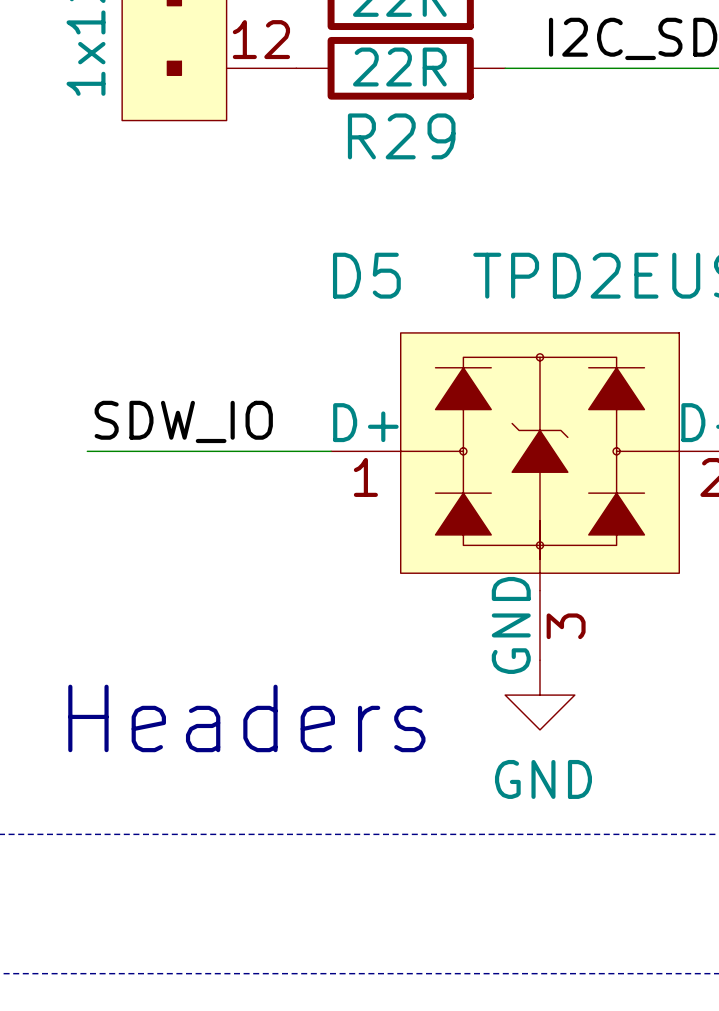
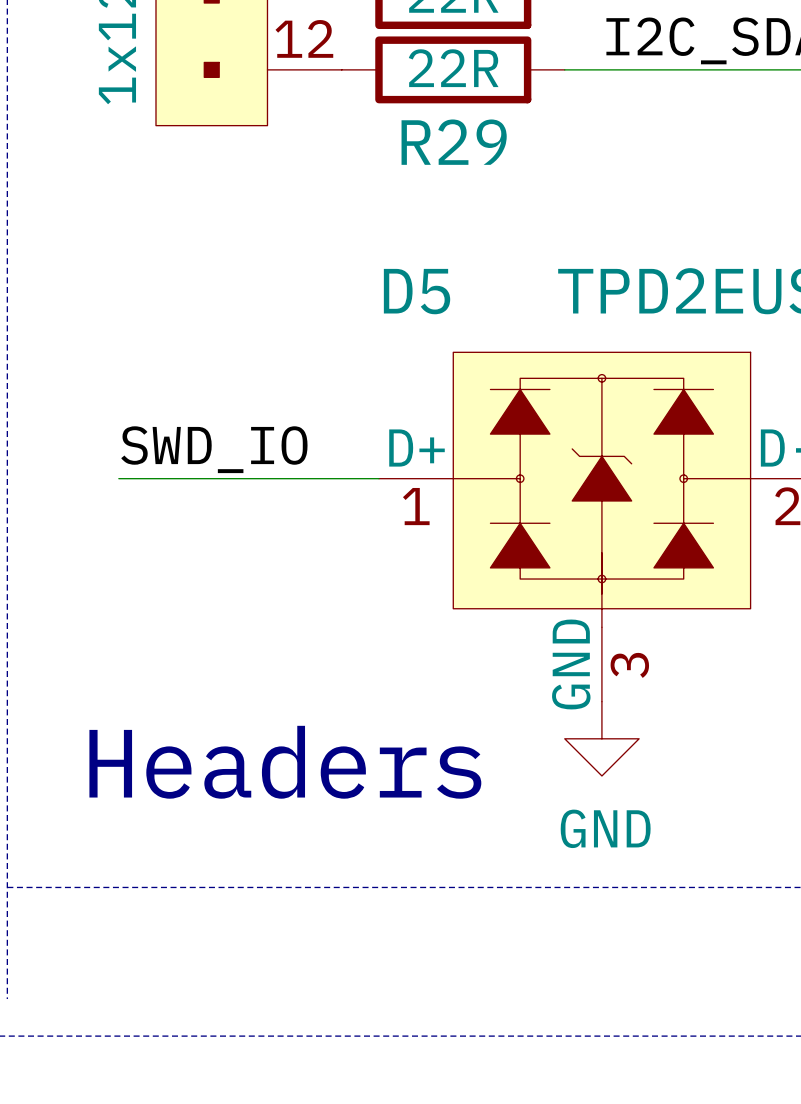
label: SDW_IO (183, 421) -> SWD_IO (214, 449)

